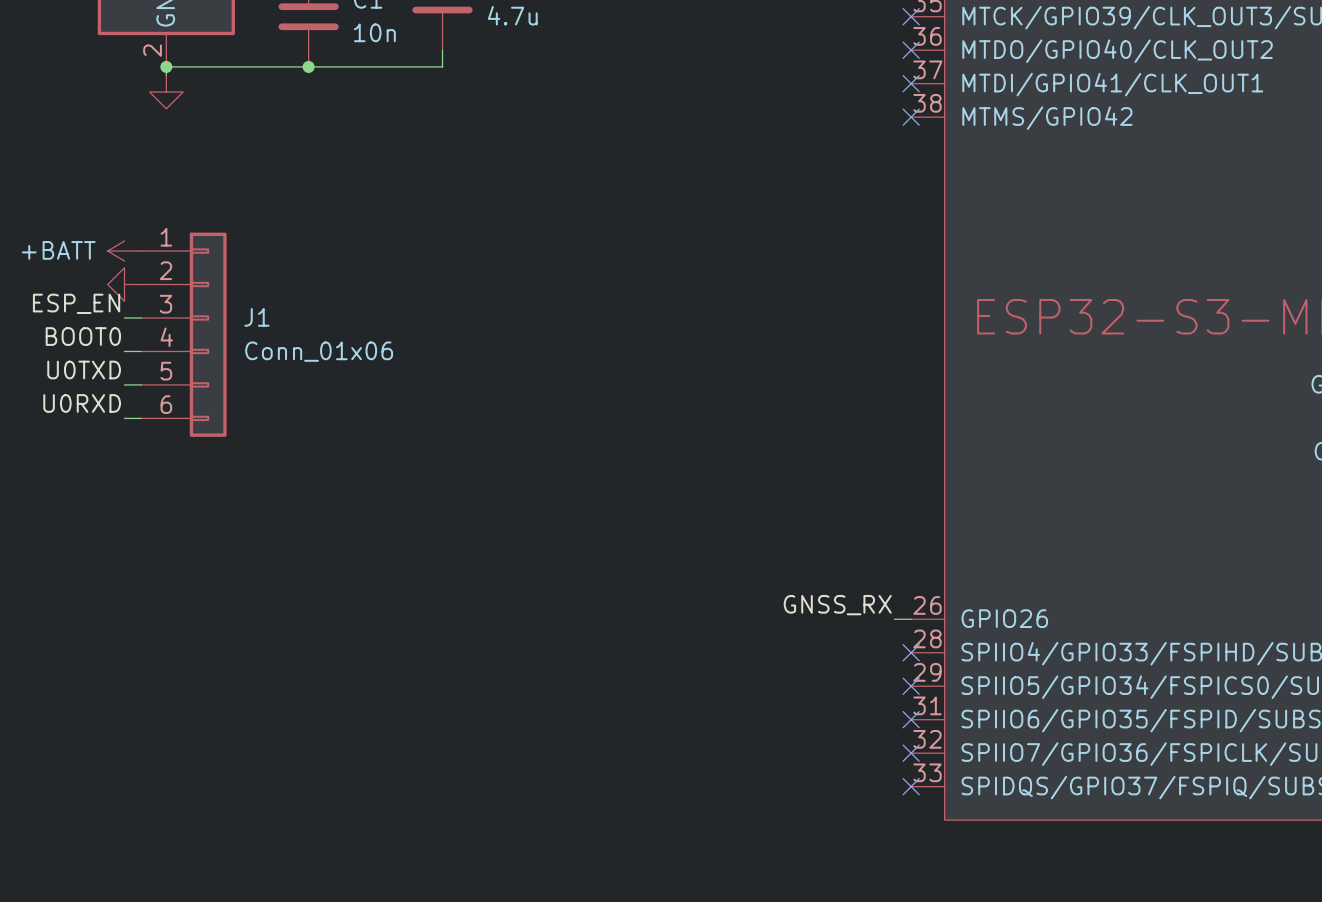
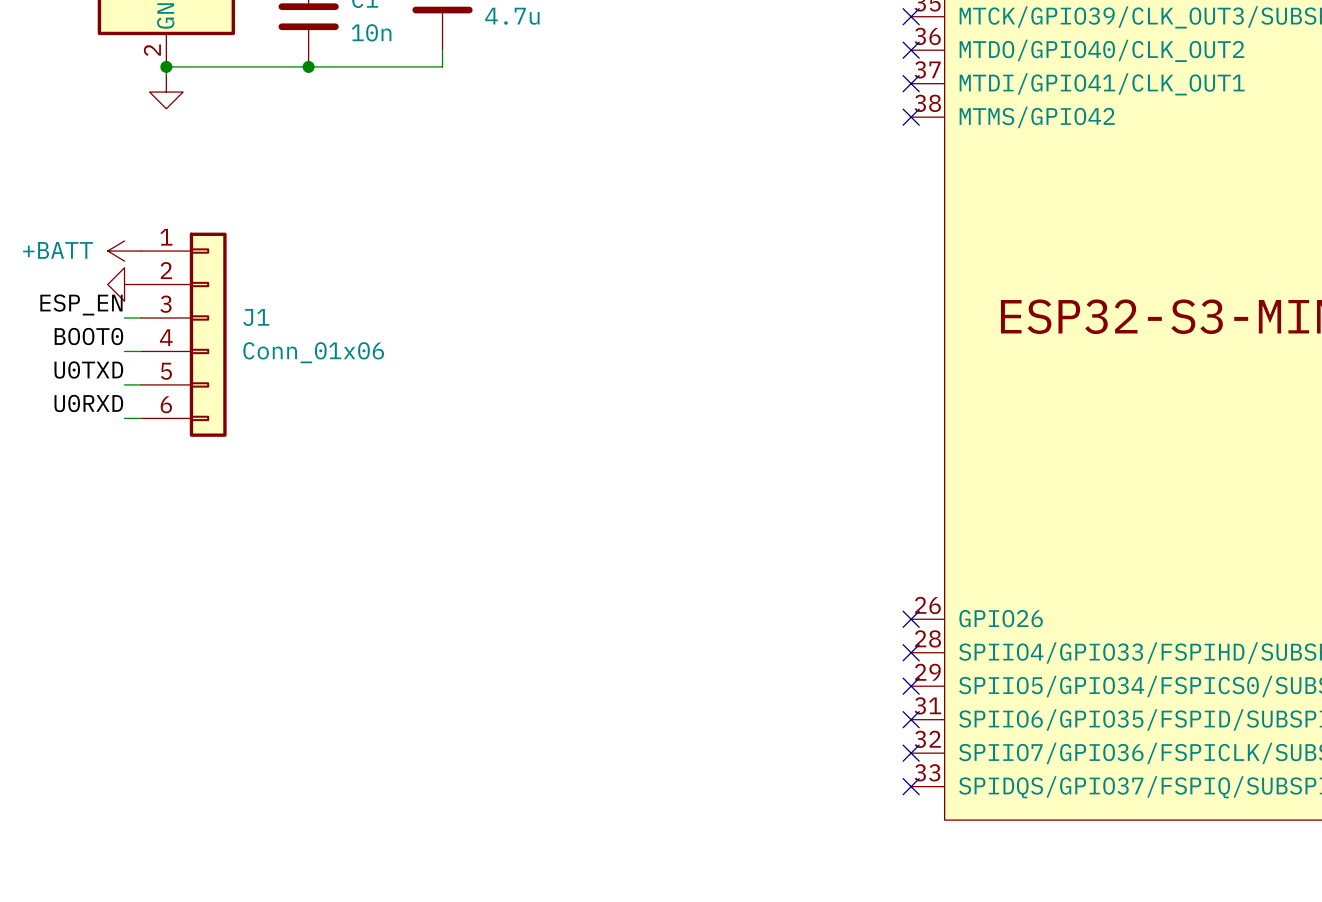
label: GNSS_RX (837, 605) -> none
wire: (894, 619) (911, 619) -> none
no-connect mark: none -> (911, 619)

